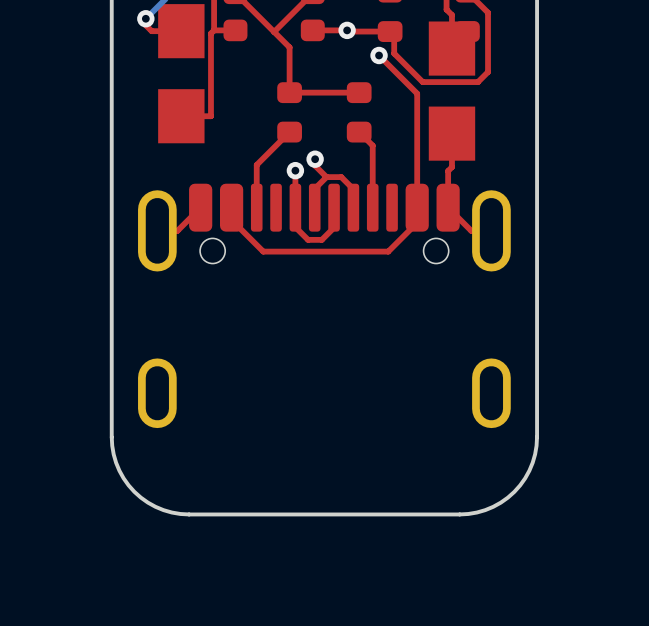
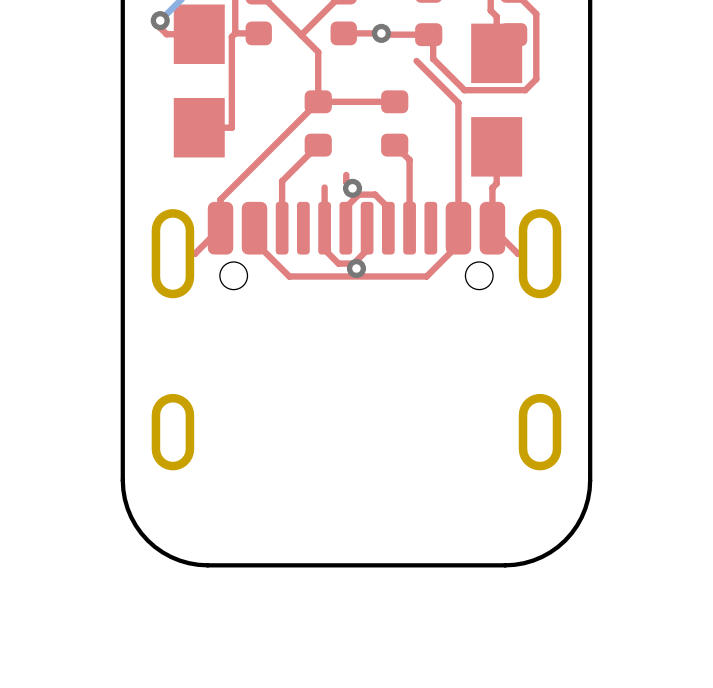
via: (379, 55) -> none
top track: none -> (318, 101) (220, 199) (220, 228)
via position: (315, 159) -> (352, 188)
via: (295, 170) -> none
via: none -> (356, 268)

